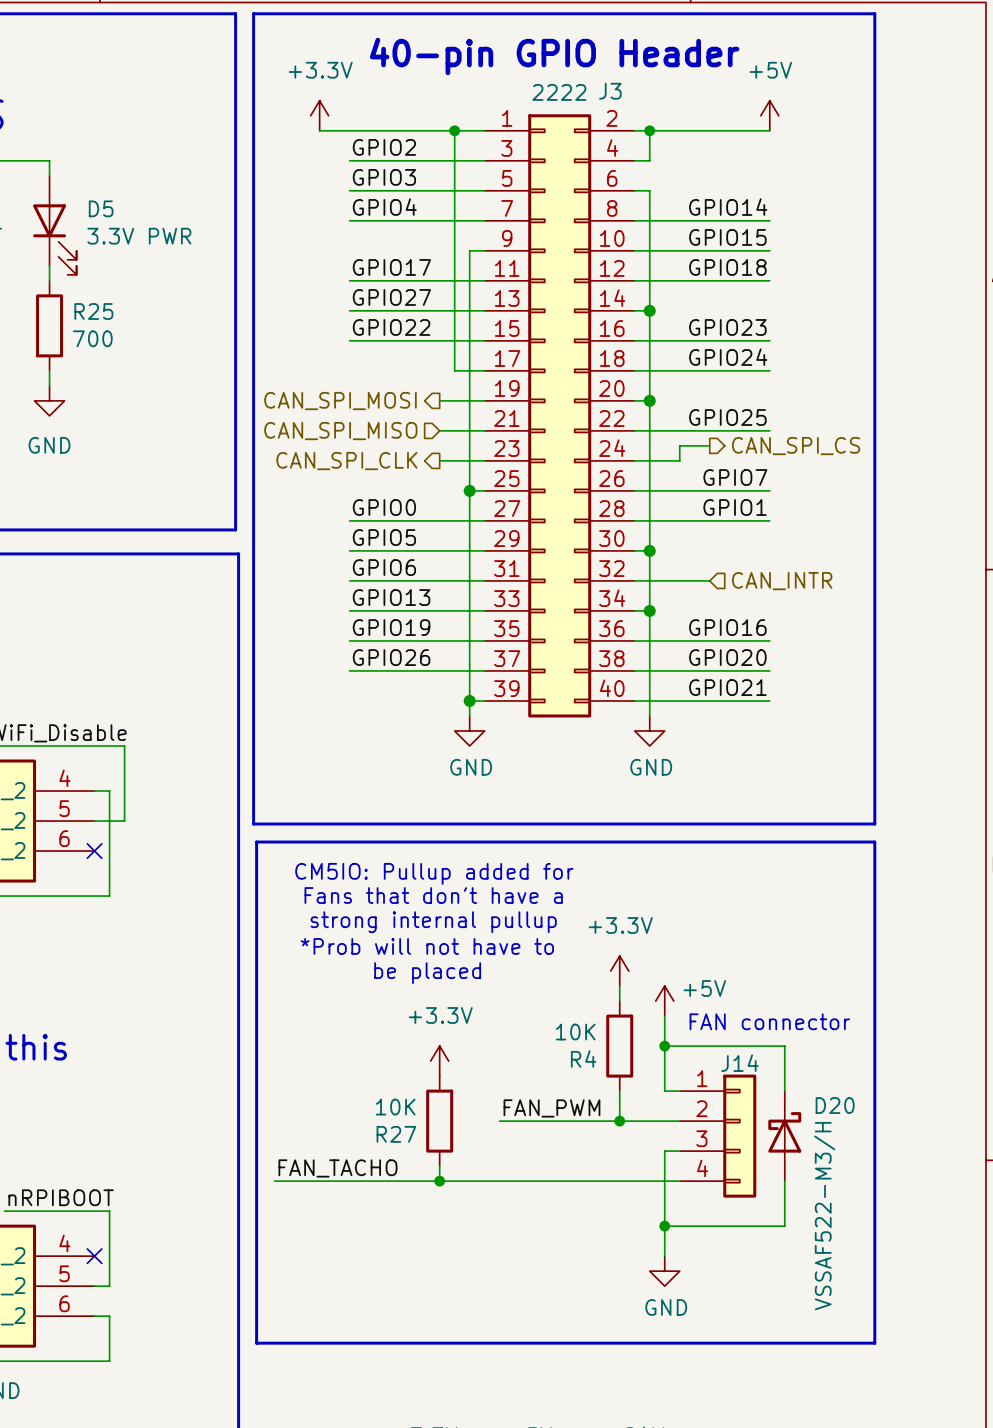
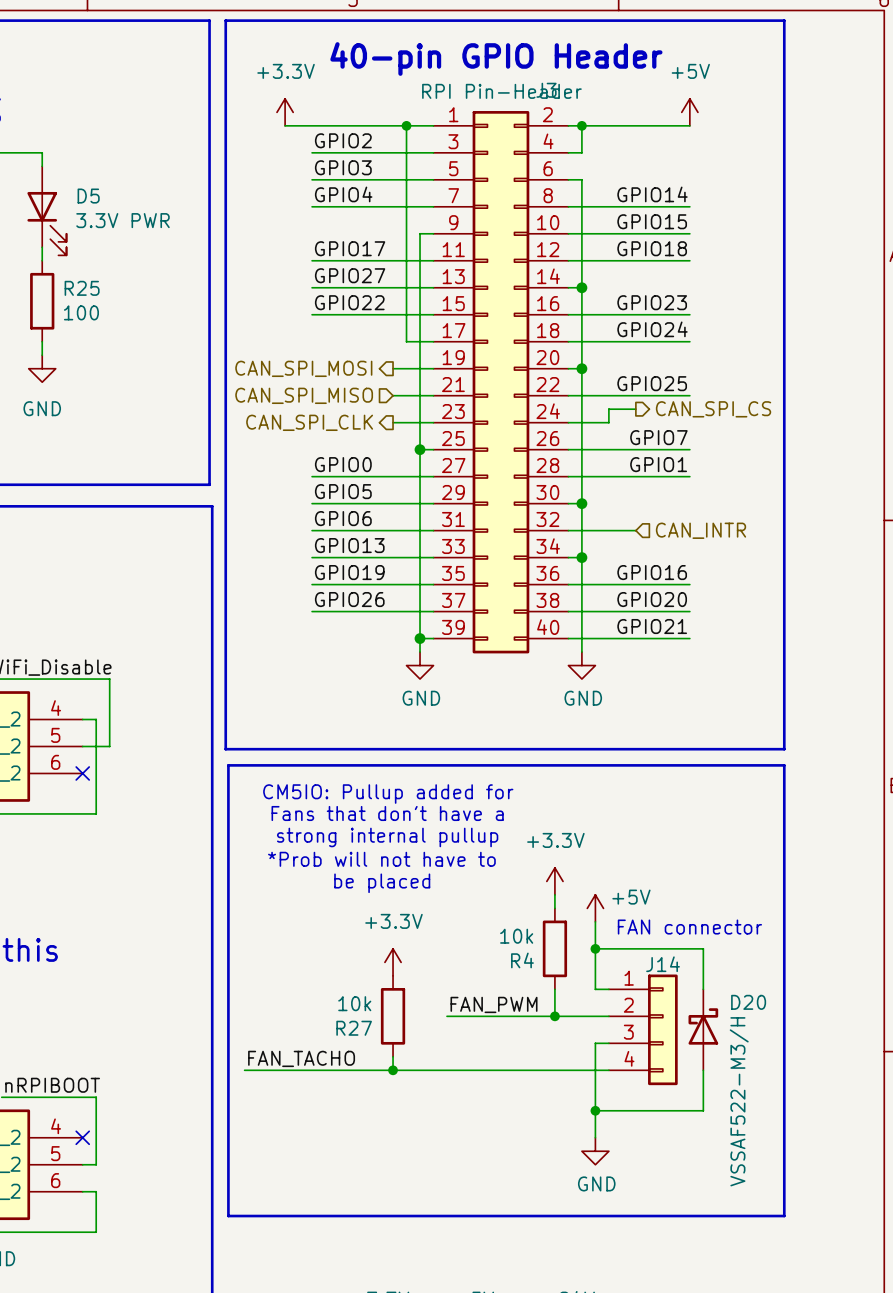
J3 value: 2222 (559, 92) -> RPI Pin-Header (501, 91)
R25 value: 700 (92, 338) -> 100 (81, 312)
R4 value: 10K (575, 1032) -> 10k (516, 936)
R27 value: 10K (395, 1107) -> 10k (354, 1003)

